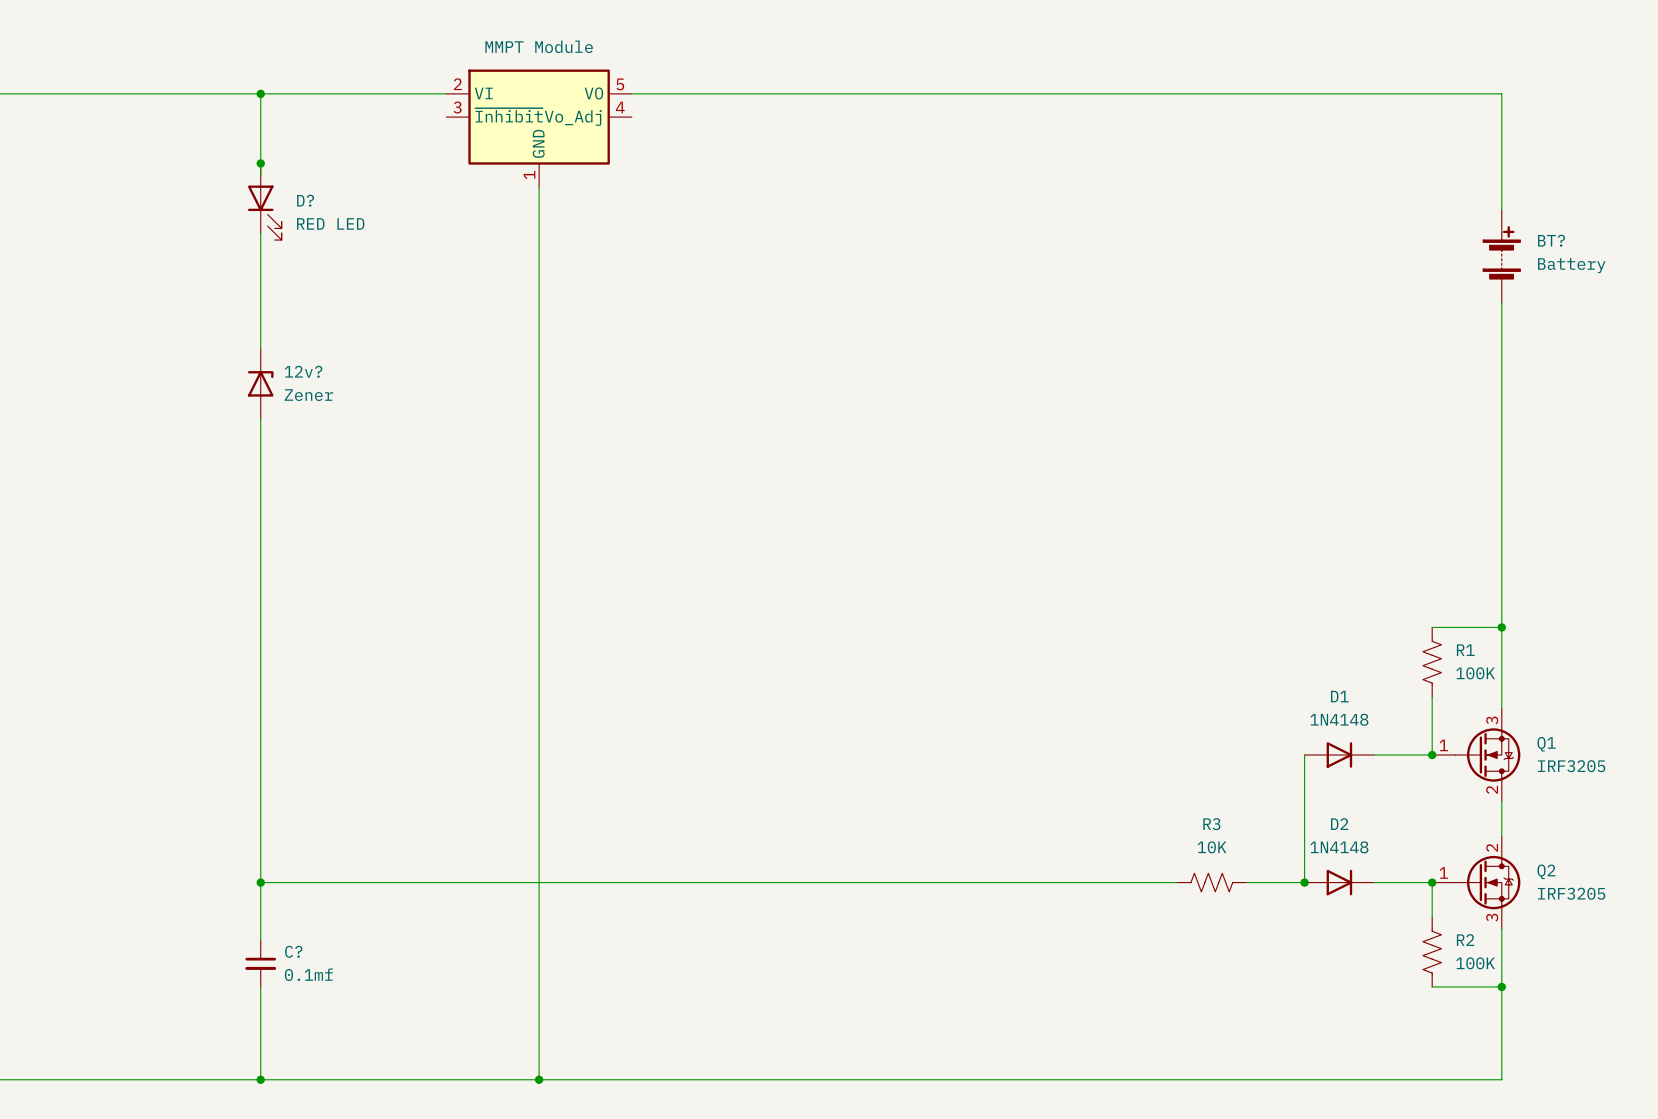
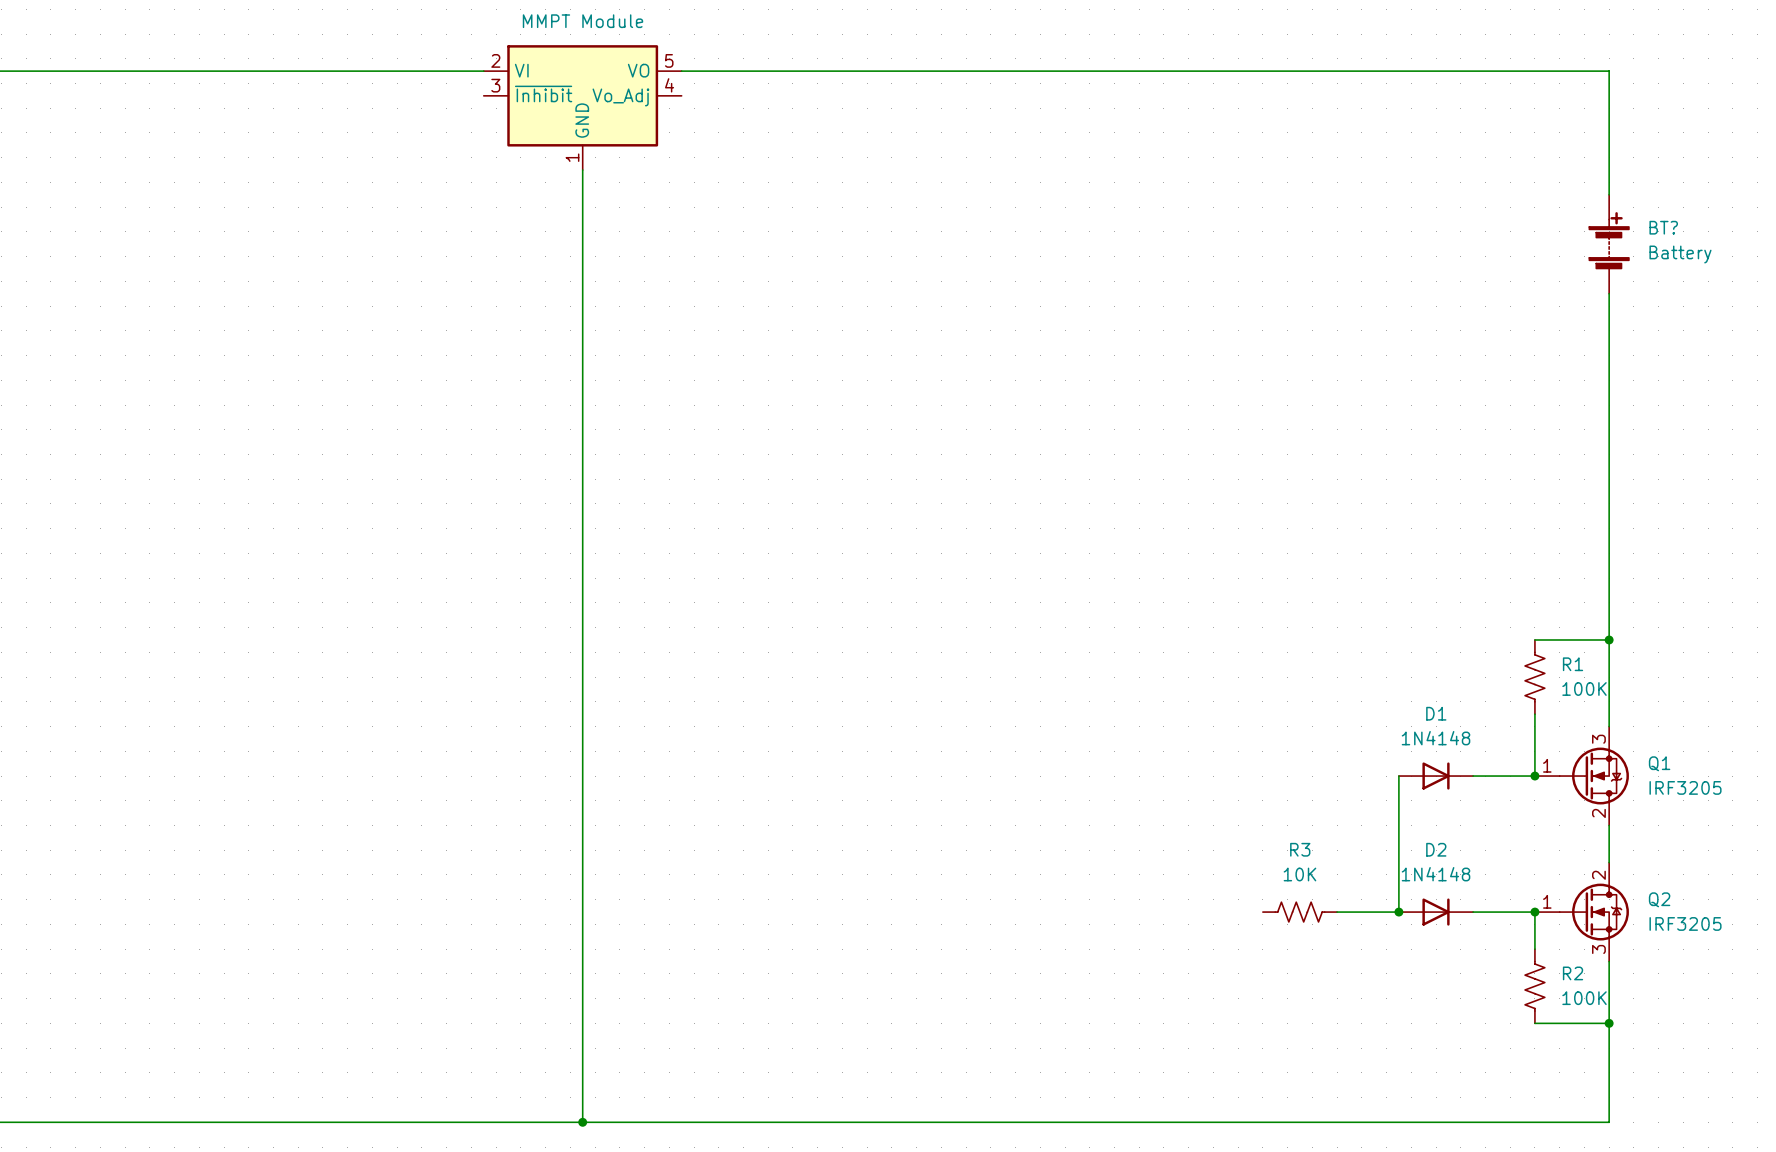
wire: (260, 93) (260, 175) -> none
junction: (260, 93) -> none
junction: (260, 163) -> none
D?: RED LED (264, 201) -> none
wire: (260, 233) (260, 349) -> none
12v?: Zener (260, 383) -> none
wire: (260, 418) (260, 940) -> none
wire: (260, 882) (1177, 882) -> none
junction: (260, 882) -> none
C?: 0.1mf (260, 963) -> none
wire: (260, 986) (260, 1079) -> none
junction: (260, 1079) -> none

